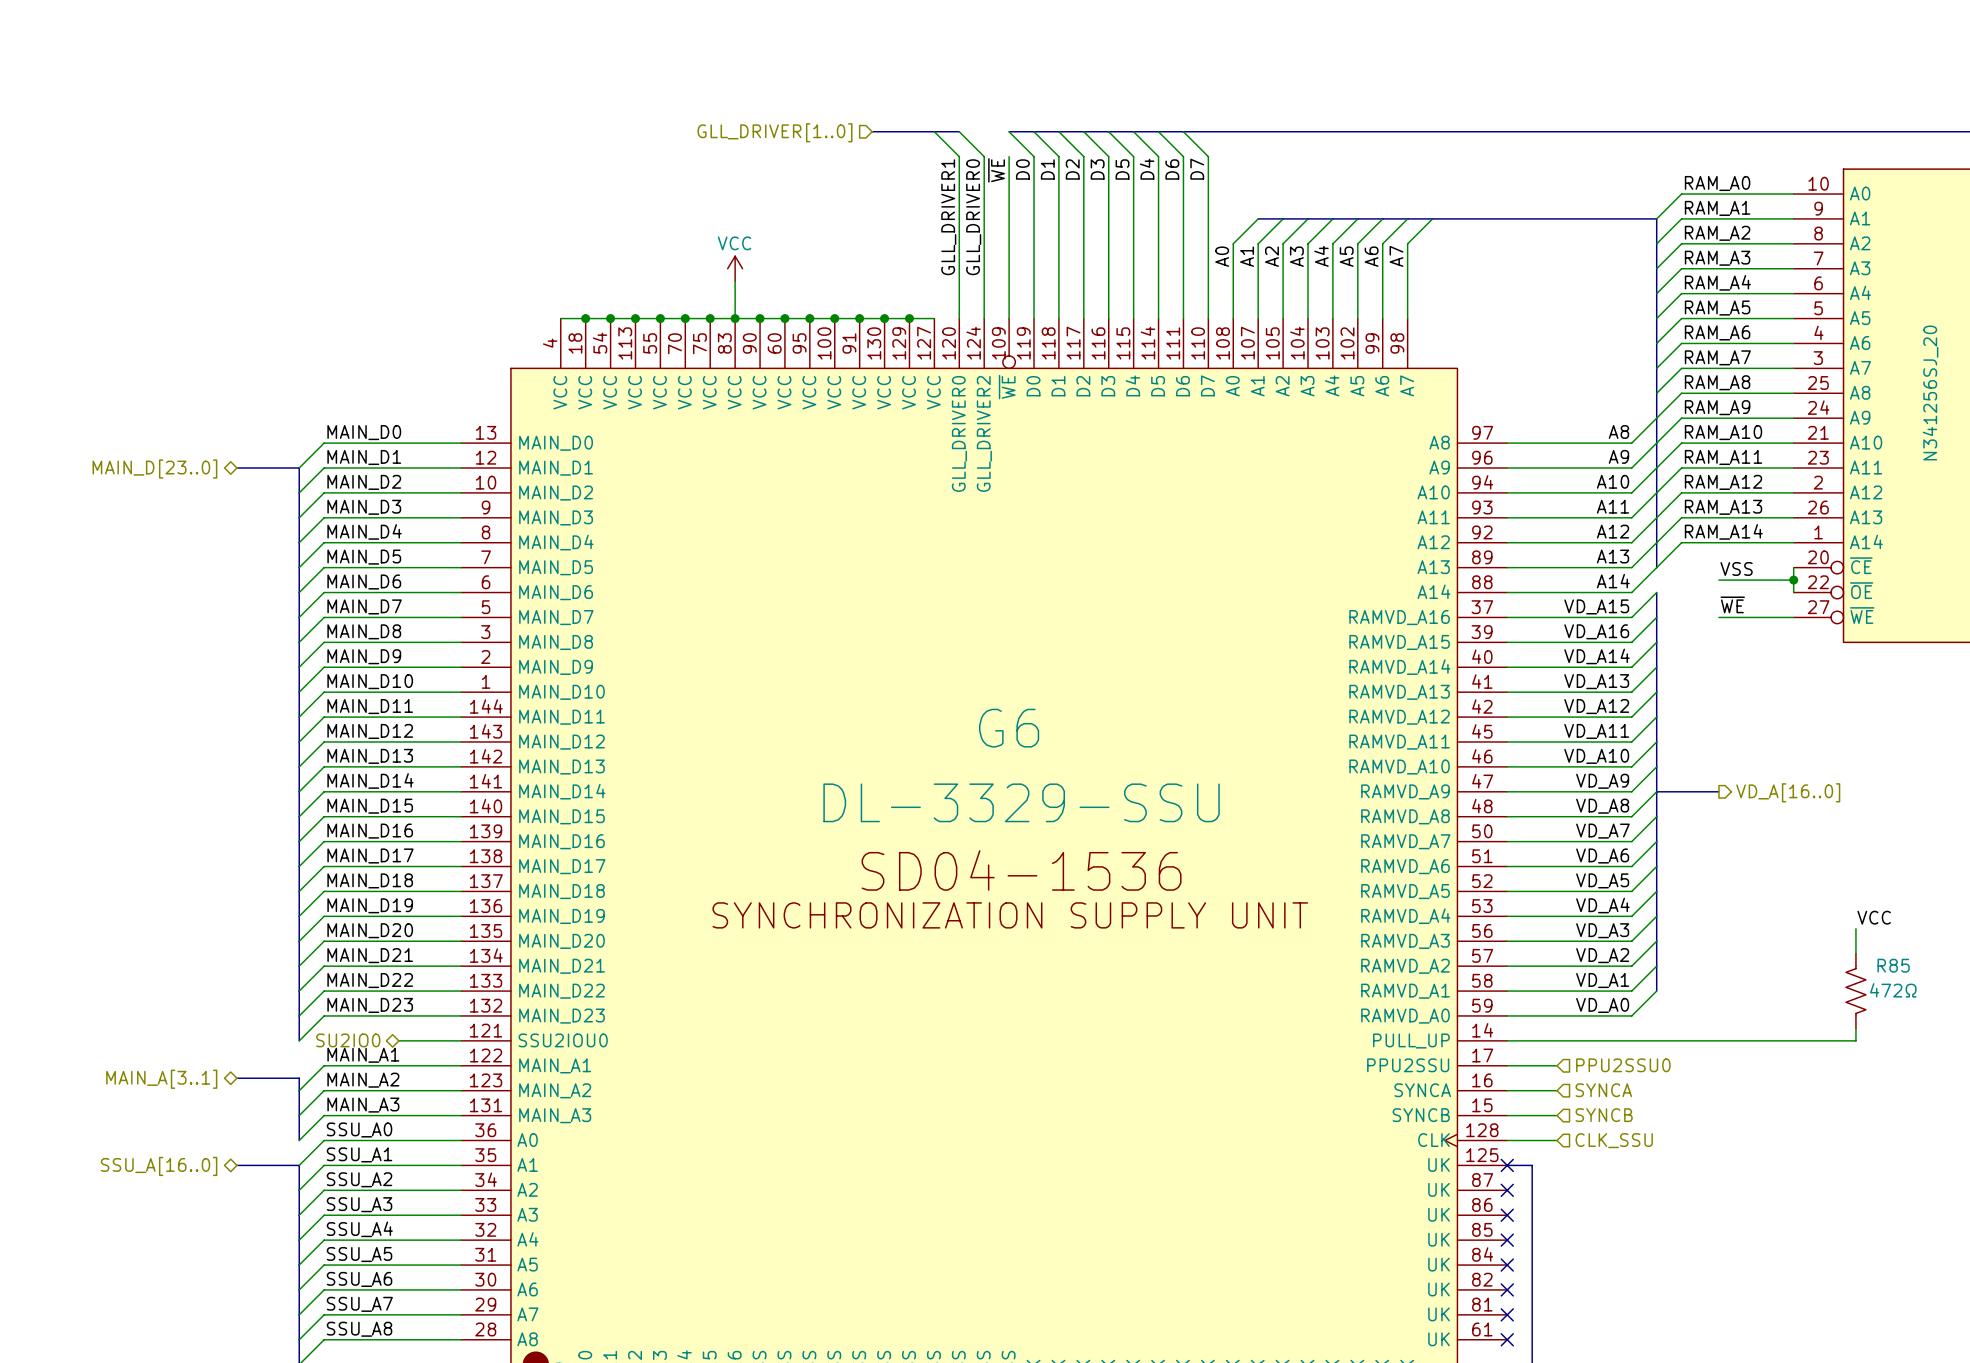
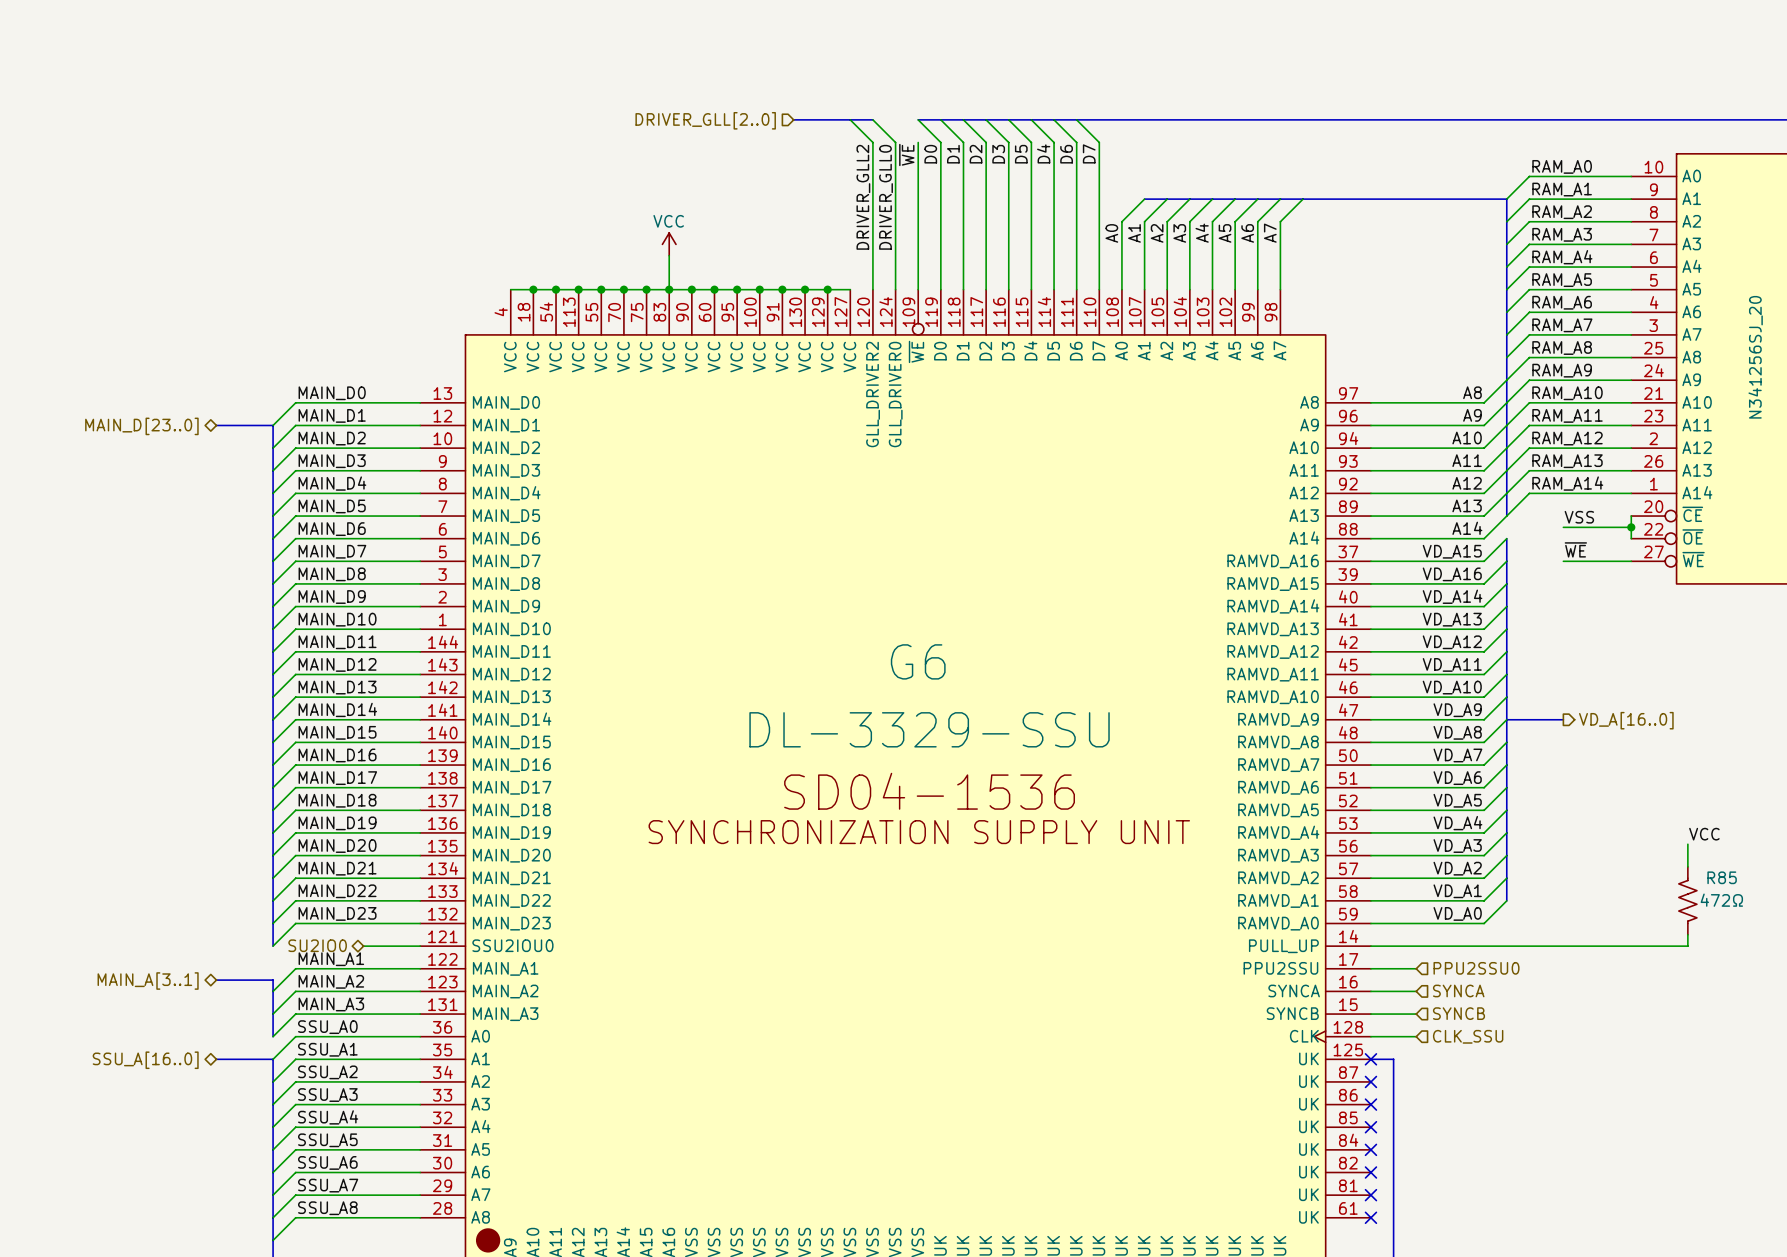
hierarchical label: GLL_DRIVER[1..0] (774, 132) -> DRIVER_GLL[2..0] (705, 120)
label: GLL_DRIVER1 (948, 217) -> DRIVER_GLL2 (863, 197)
label: GLL_DRIVER0 (973, 217) -> DRIVER_GLL0 (886, 197)
G6 pin name: GLL_DRIVER0 (959, 433) -> GLL_DRIVER2 (873, 394)
G6 pin name: GLL_DRIVER2 (984, 433) -> GLL_DRIVER0 (895, 394)

